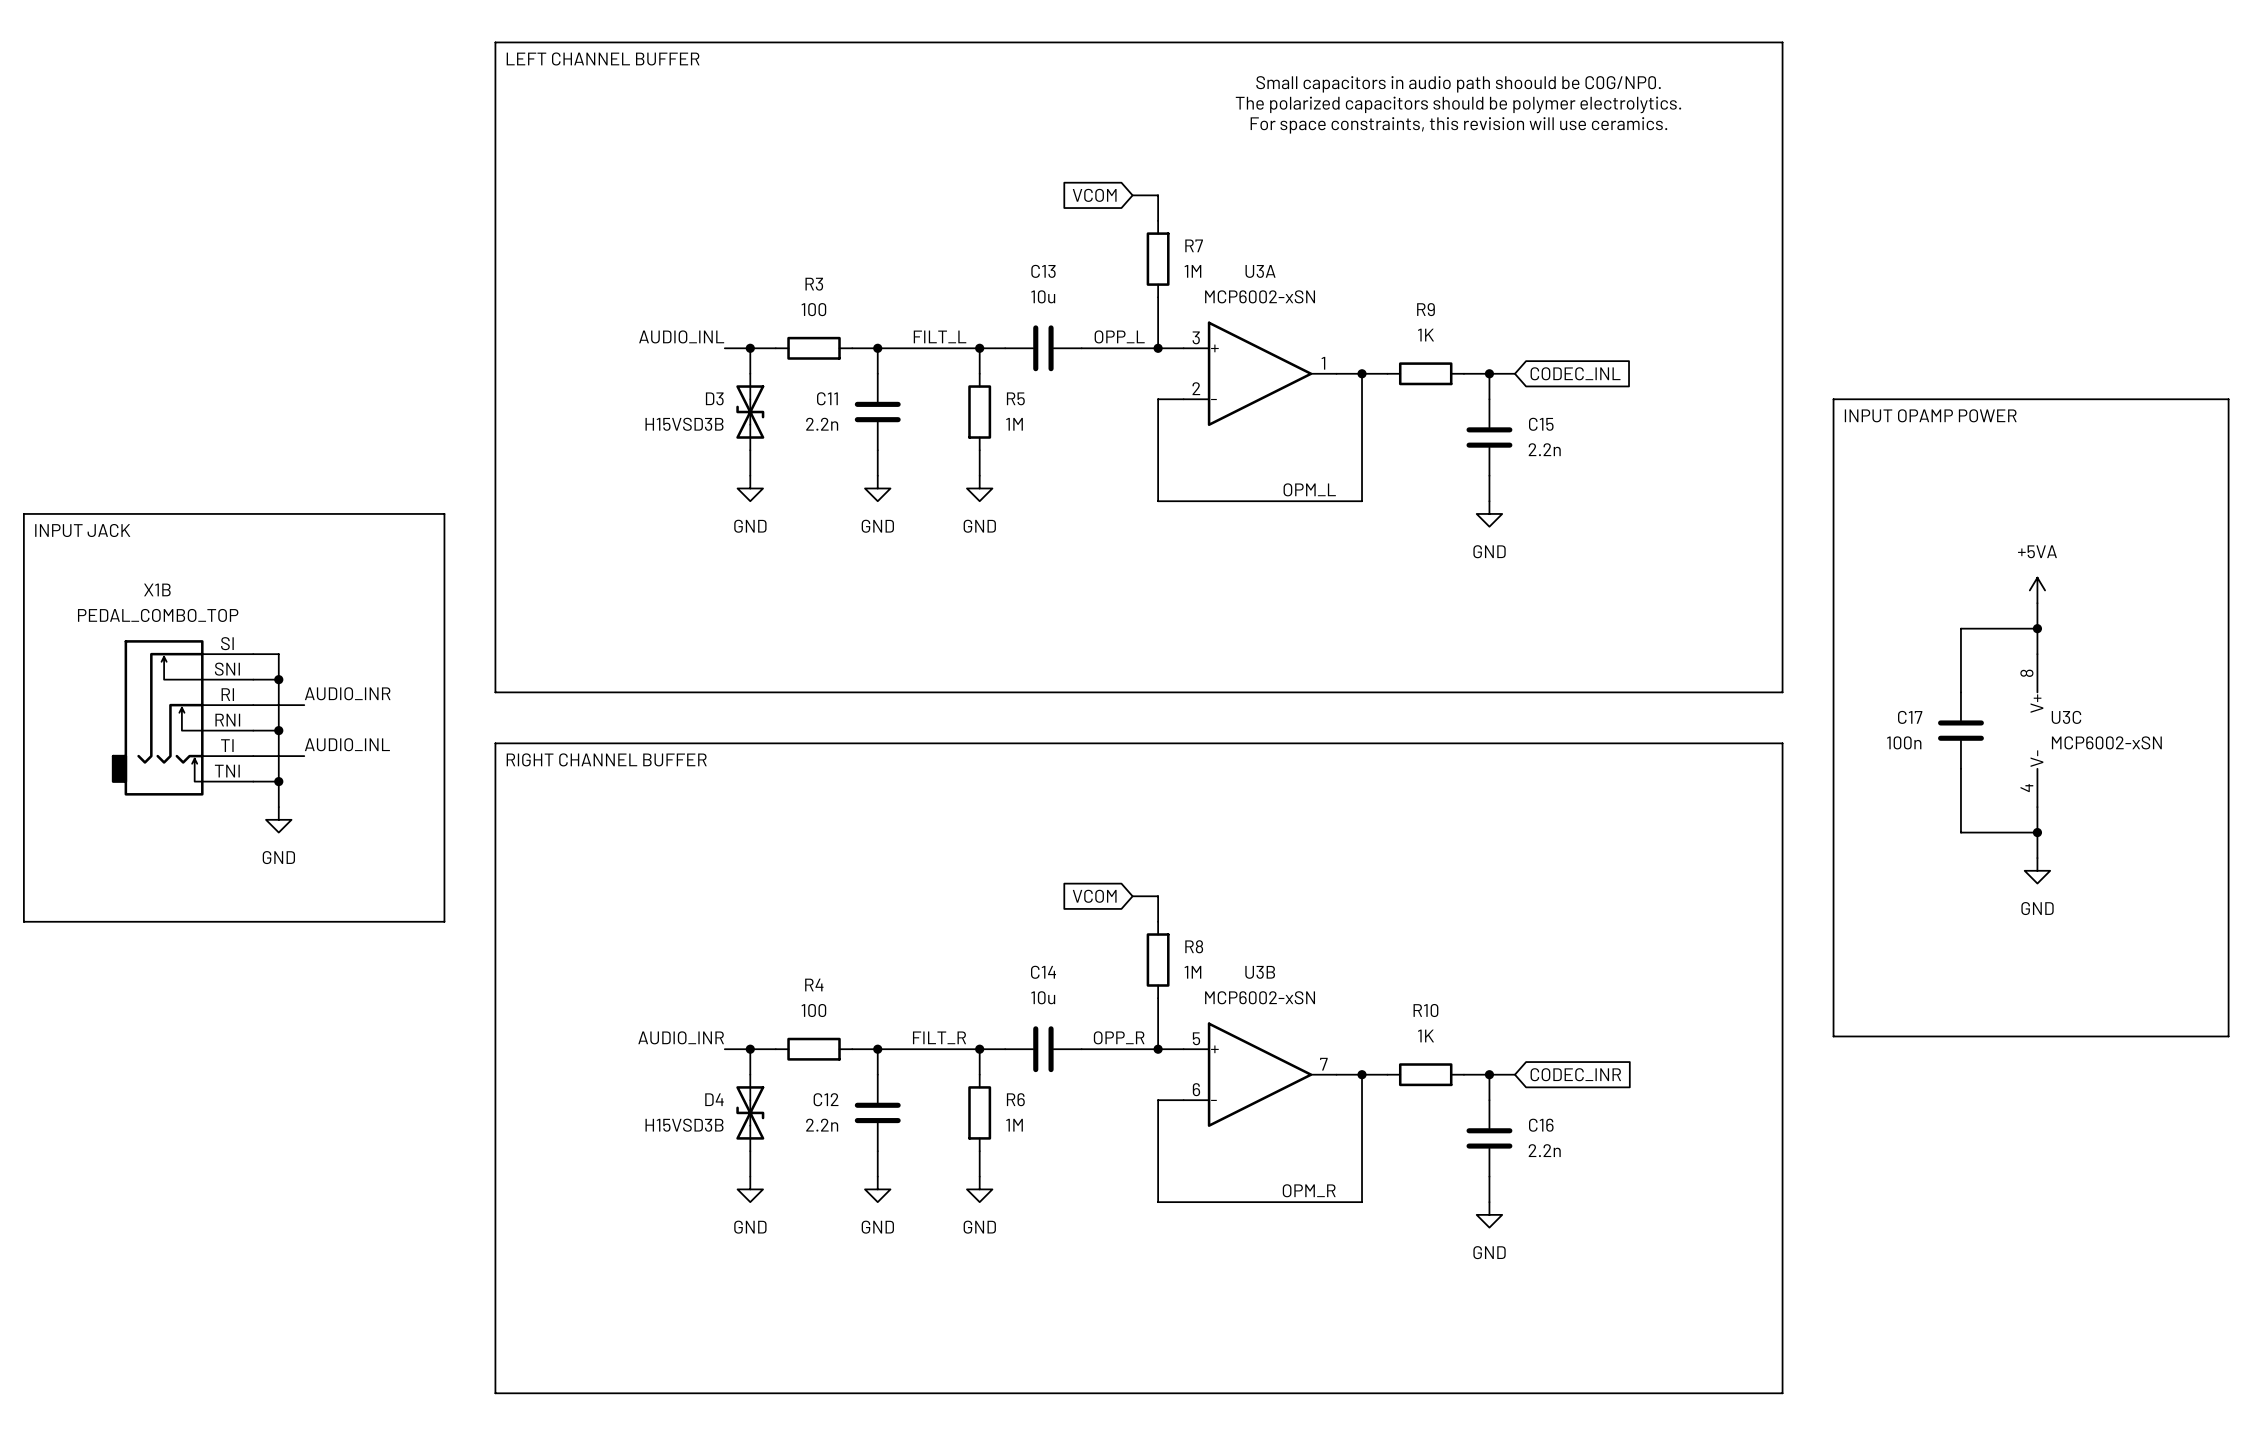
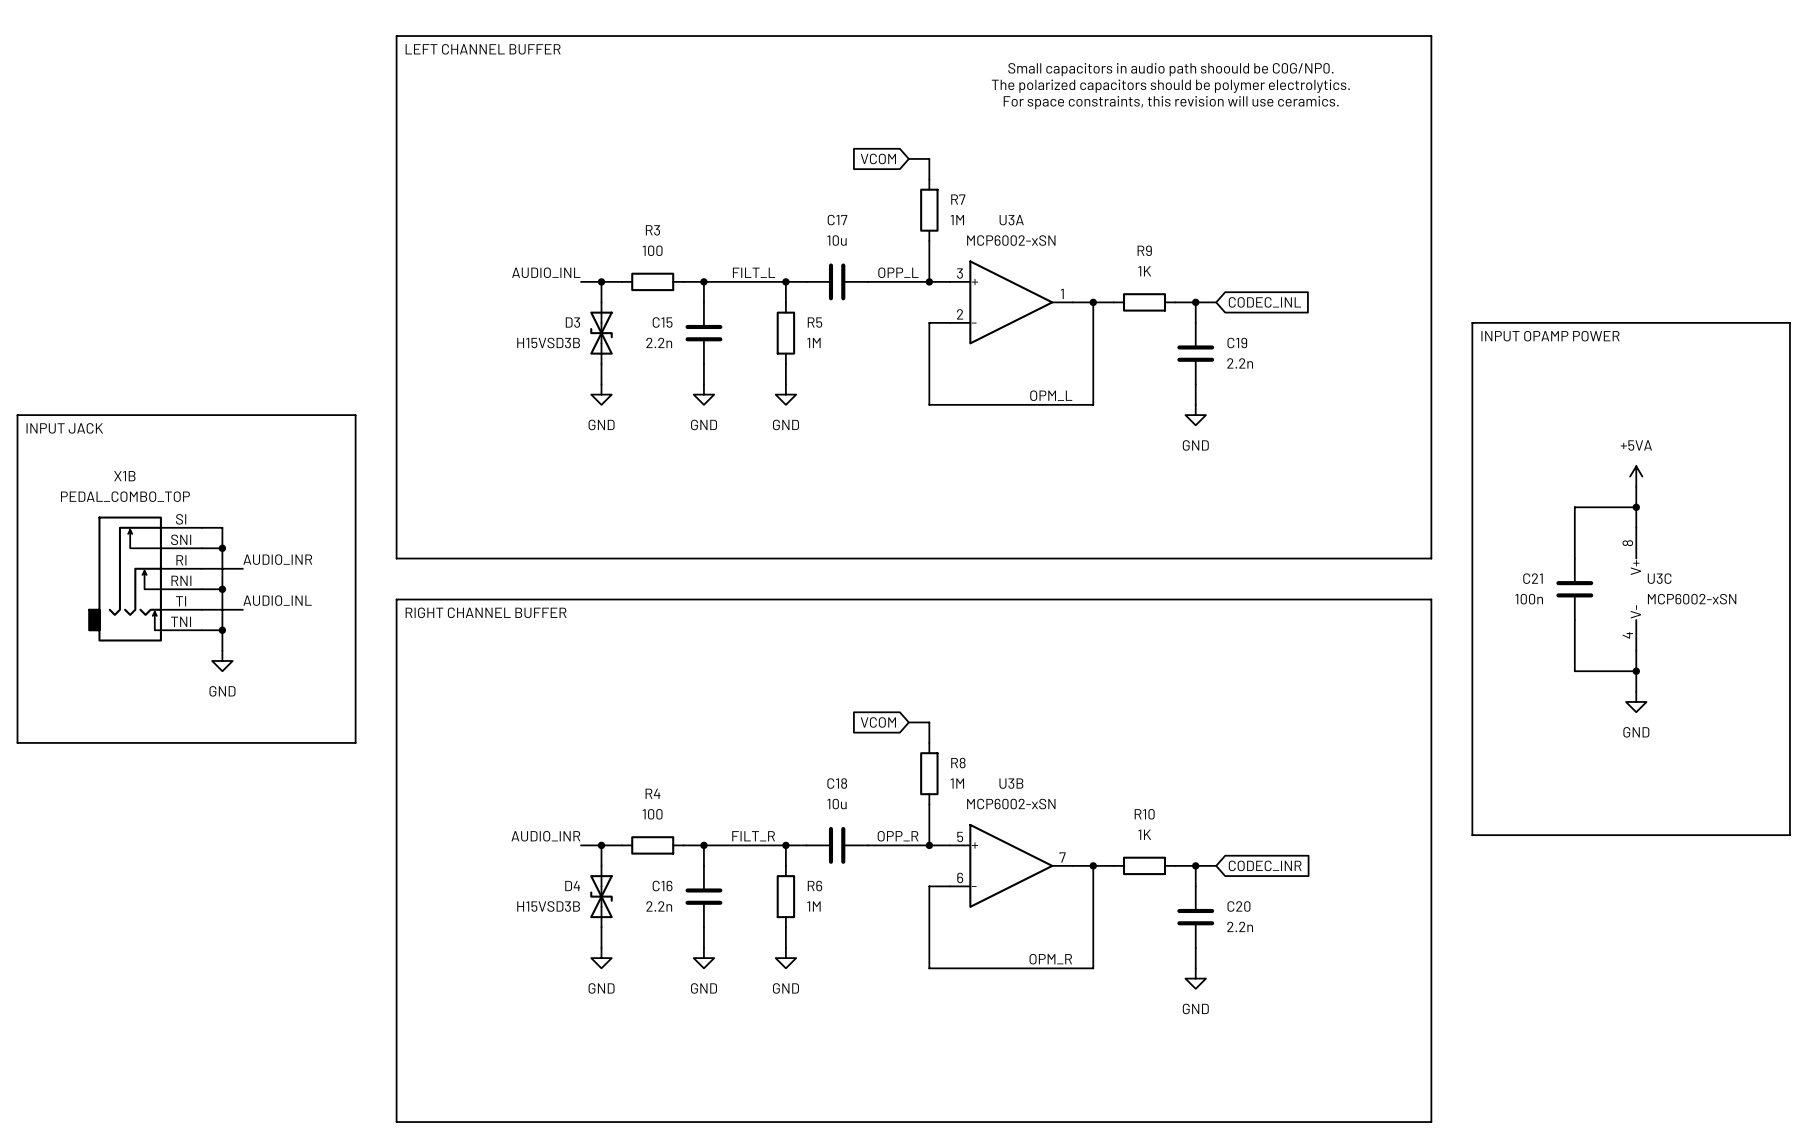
C13 name: C13 (1043, 271) -> C17 (837, 220)
C11 name: C11 (827, 398) -> C15 (662, 322)
C15 name: C15 (1541, 424) -> C19 (1237, 343)
C17 name: C17 (1910, 717) -> C21 (1532, 578)
C14 name: C14 (1043, 972) -> C18 (837, 783)
C12 name: C12 (826, 1099) -> C16 (662, 886)
C16 name: C16 (1541, 1125) -> C20 (1238, 906)

